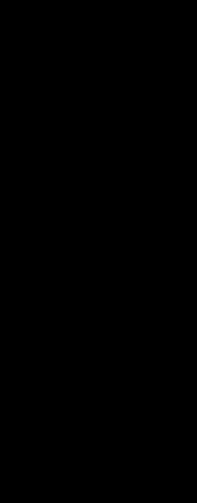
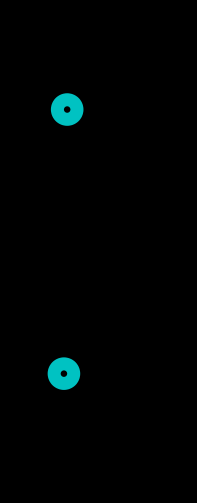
part: none -> (67, 109)
part: none -> (63, 373)

